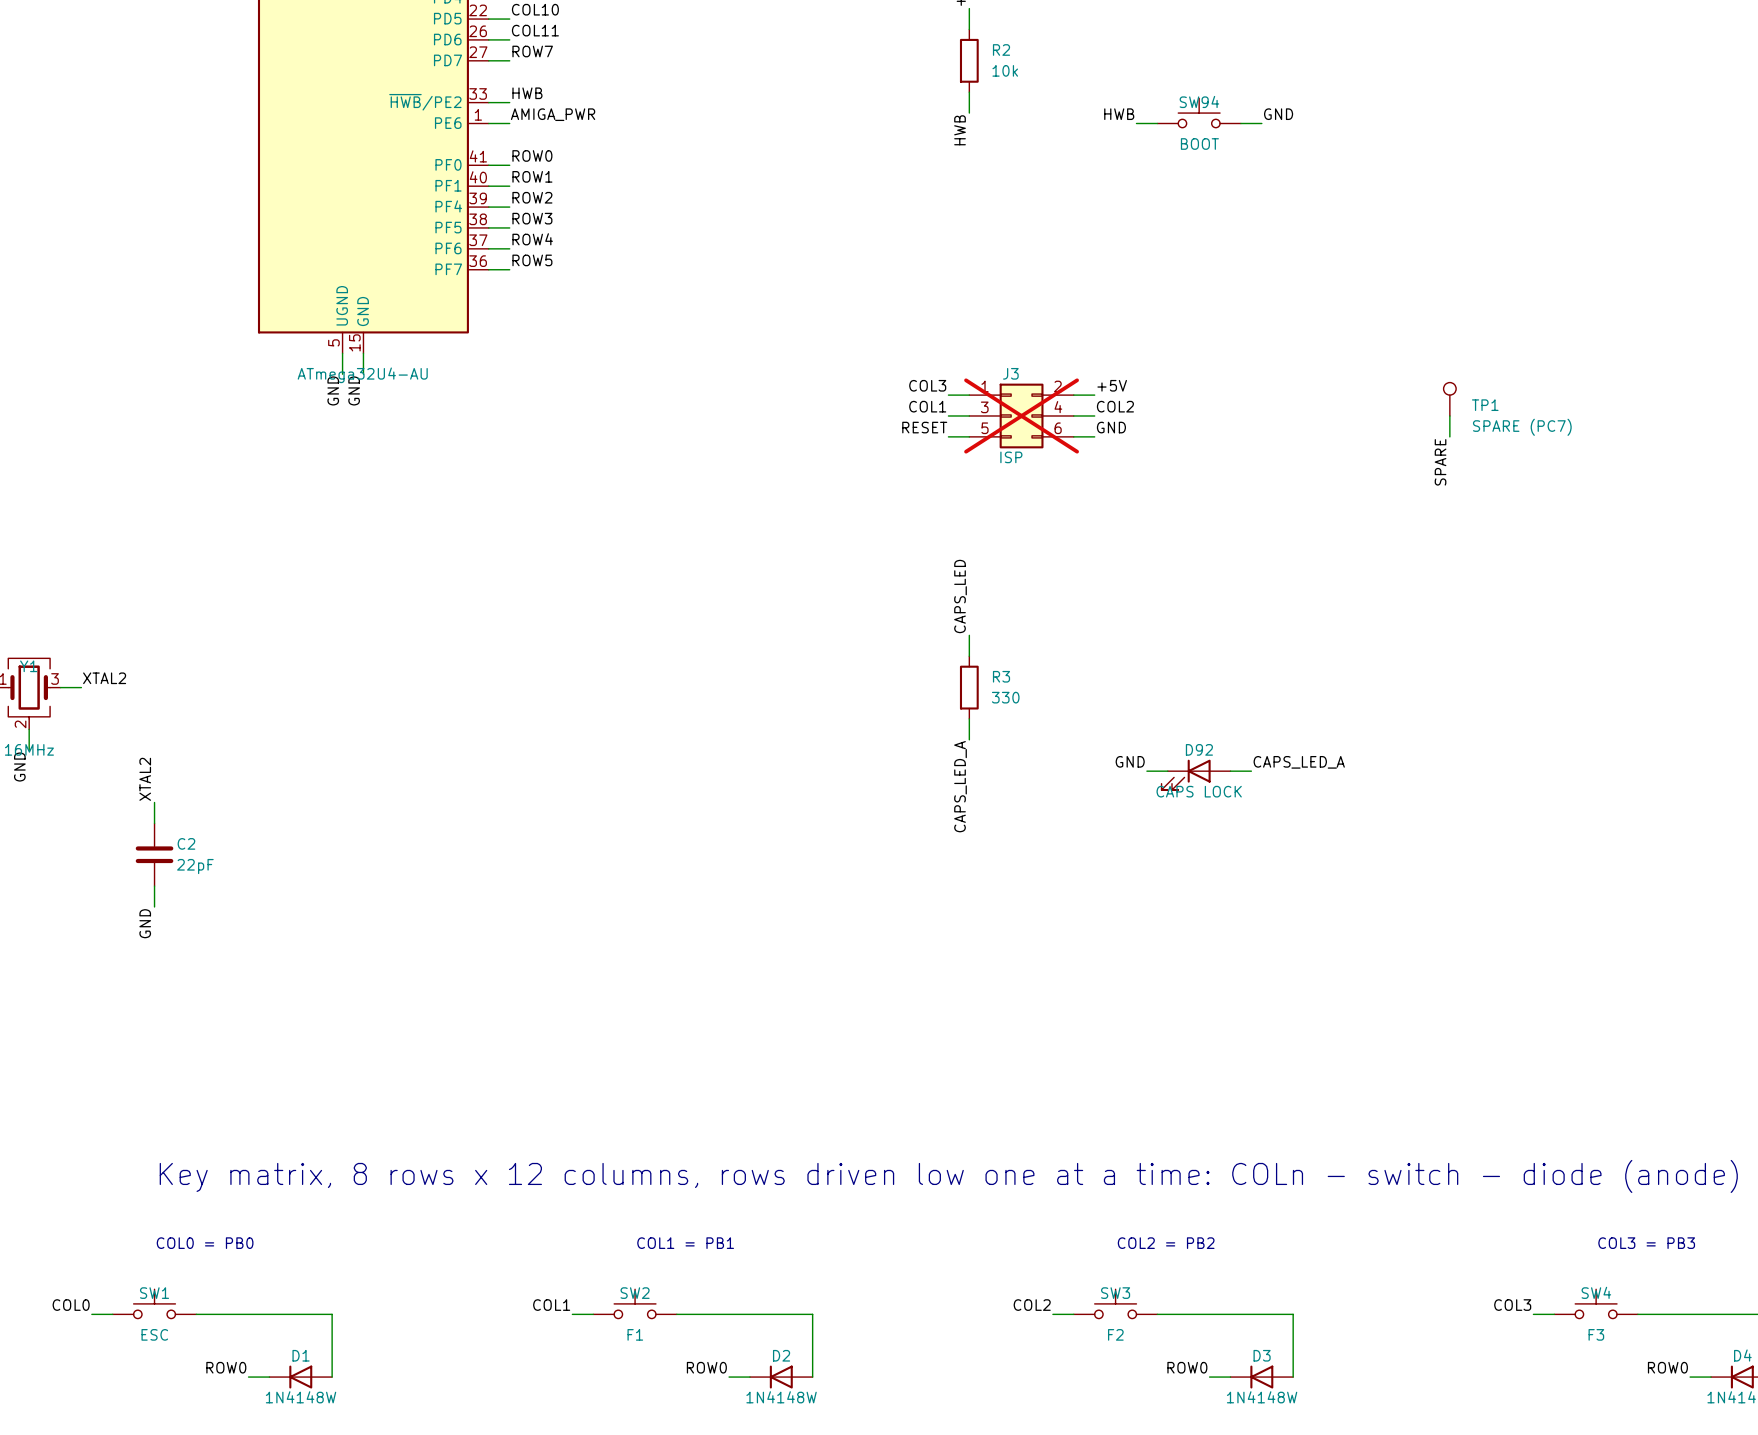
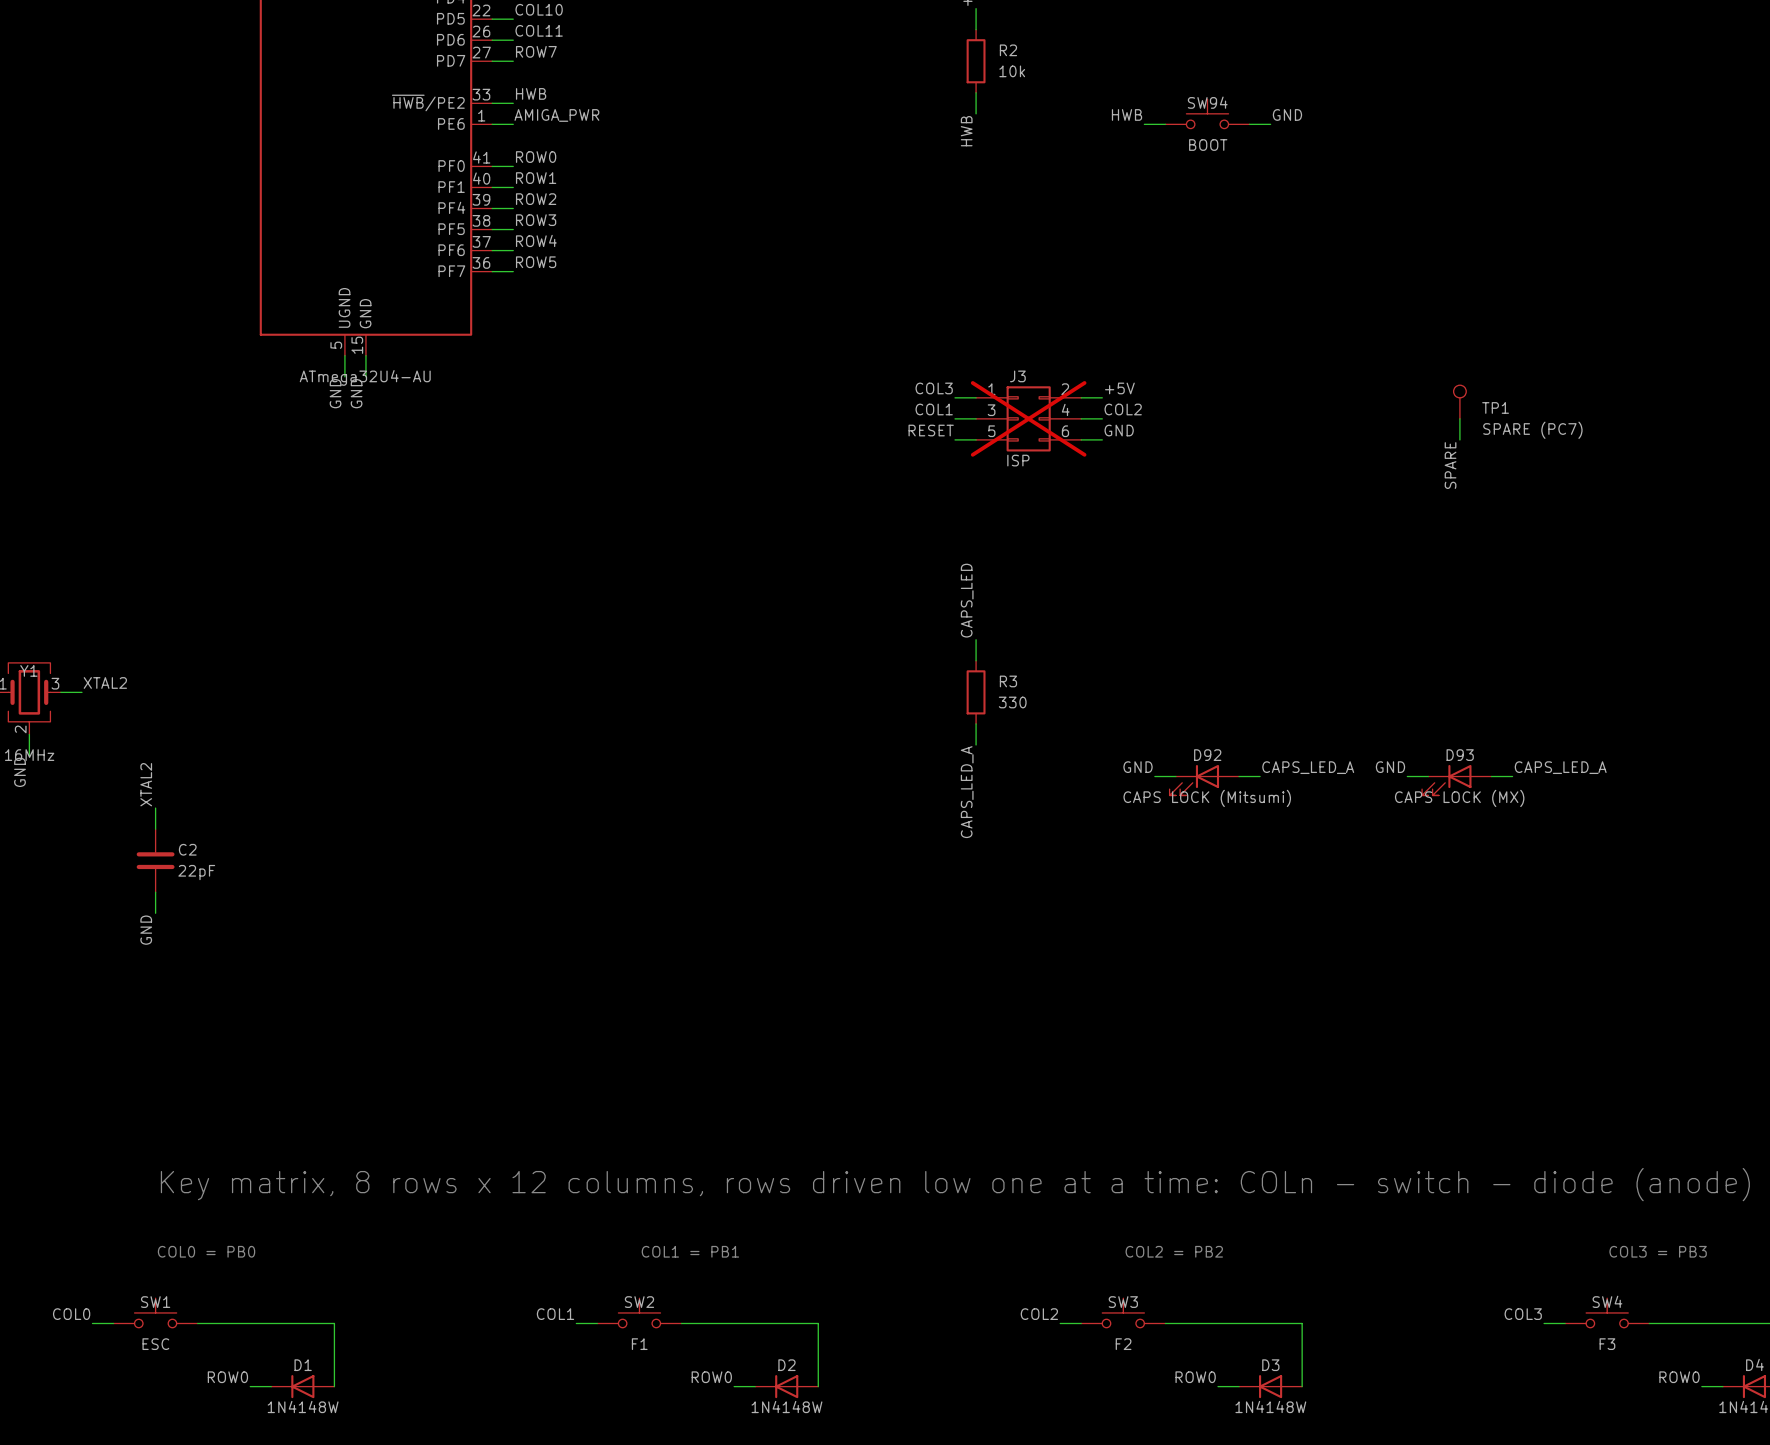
label: none -> GND (1390, 767)
label: none -> CAPS_LED_A (1560, 767)
wire: none -> (1407, 776) (1428, 776)
wire: none -> (1491, 776) (1512, 776)
D93: none -> CAPS LOCK (MX) (1456, 780)
D92 value: CAPS LOCK (1199, 791) -> CAPS LOCK (Mitsumi) (1207, 798)

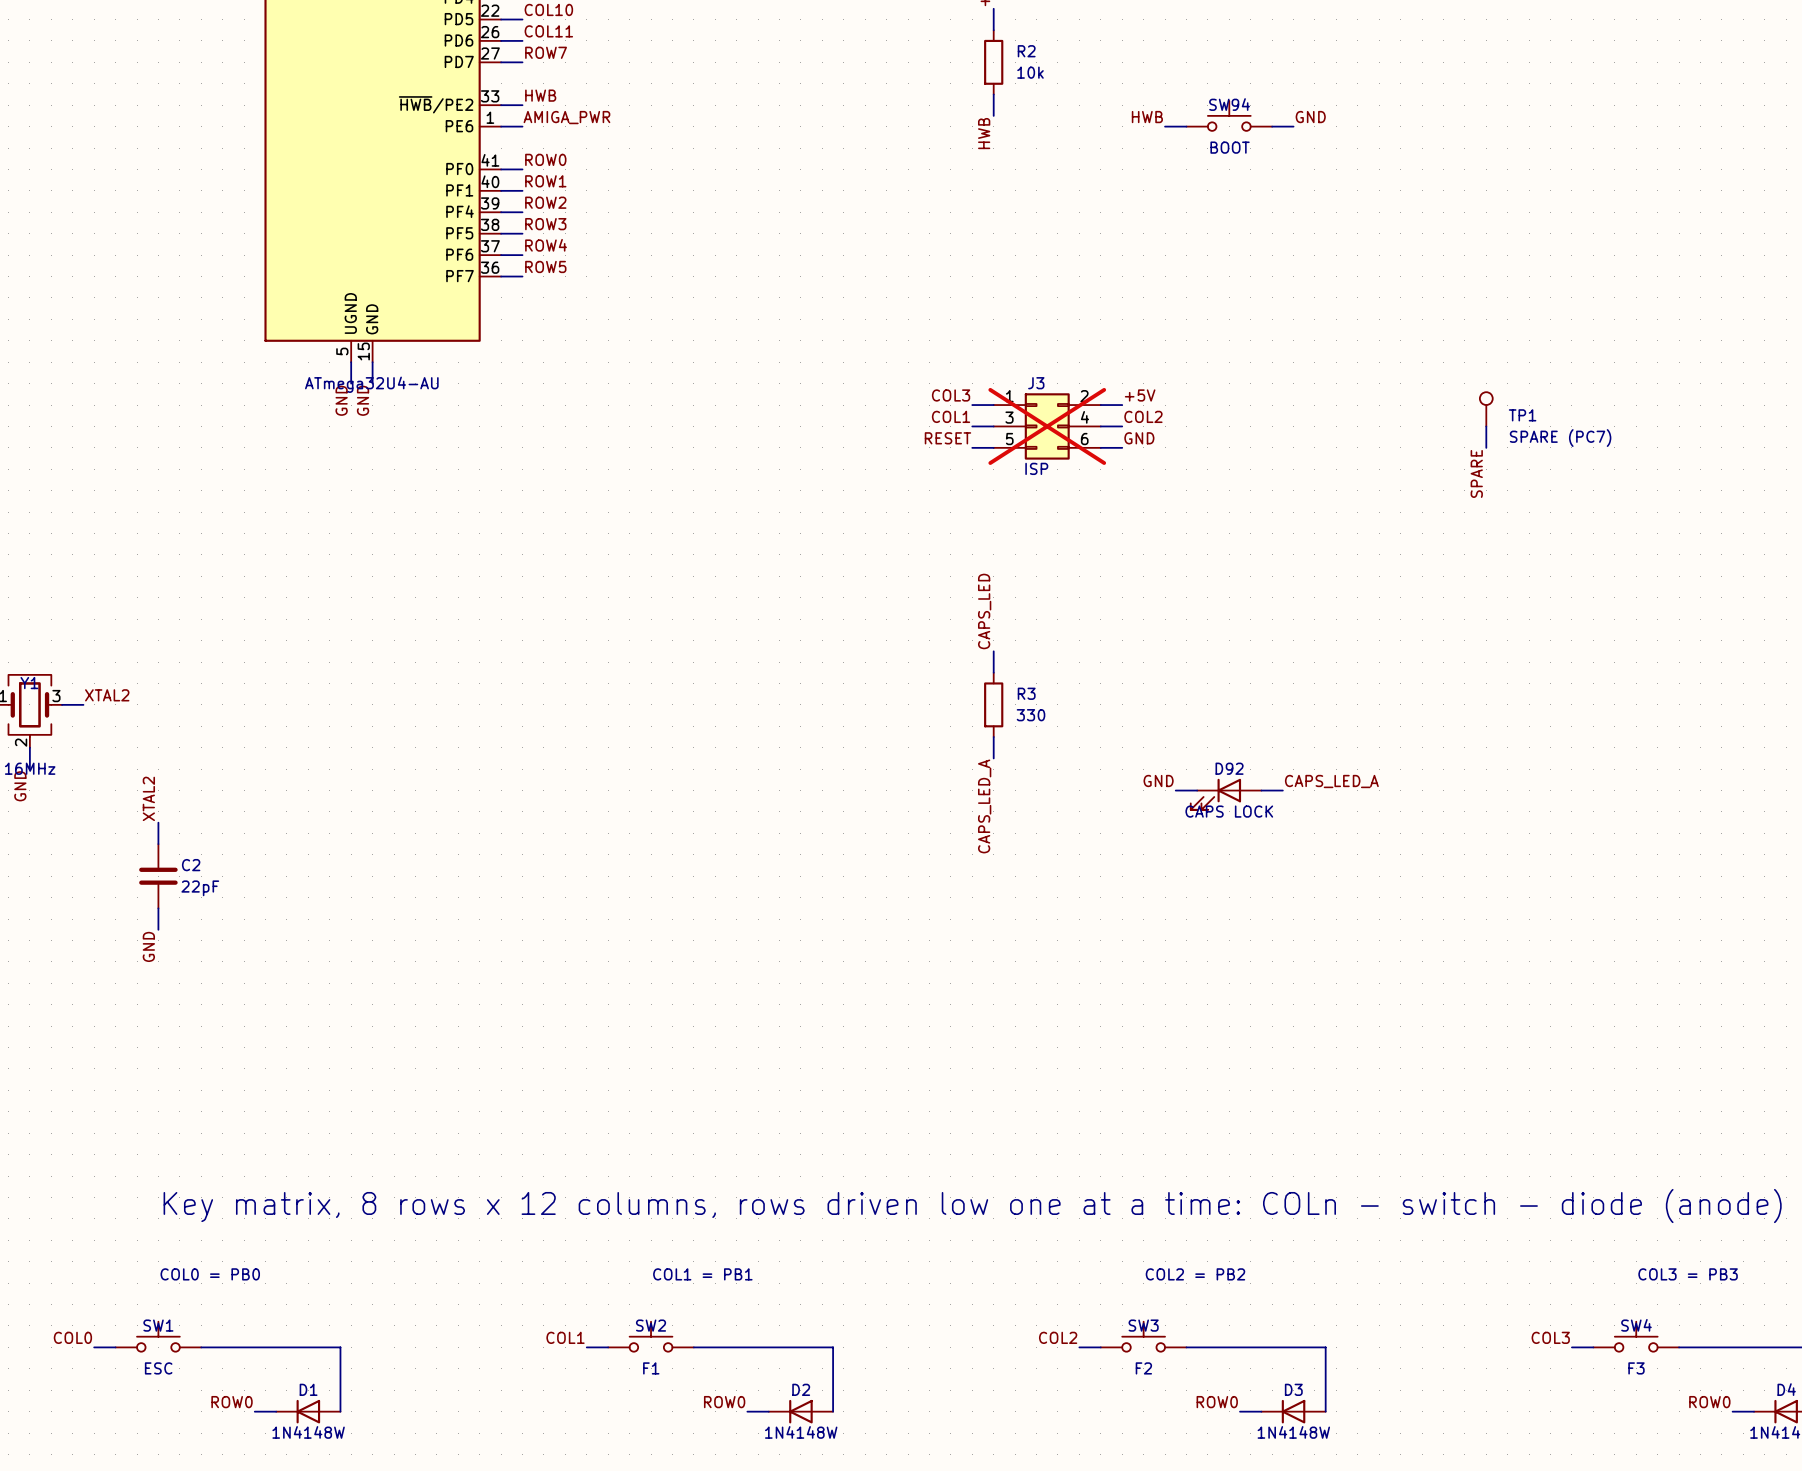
label: GND (1390, 767) -> none
label: CAPS_LED_A (1560, 767) -> none
wire: (1407, 776) (1428, 776) -> none
wire: (1491, 776) (1512, 776) -> none
D93: CAPS LOCK (MX) (1456, 780) -> none
D92 value: CAPS LOCK (Mitsumi) (1207, 798) -> CAPS LOCK (1229, 811)

